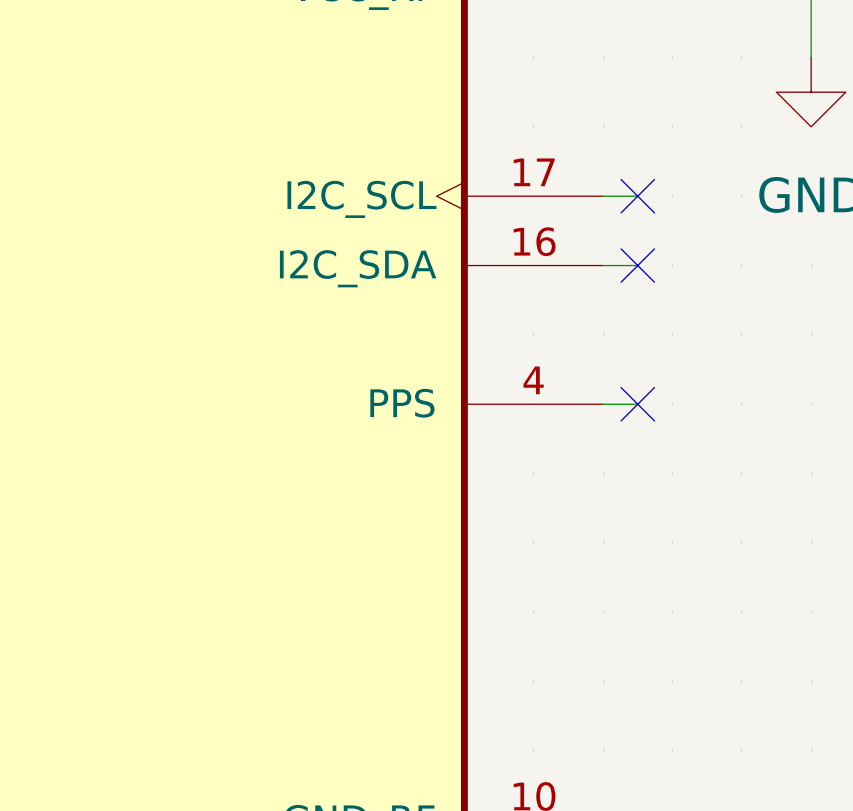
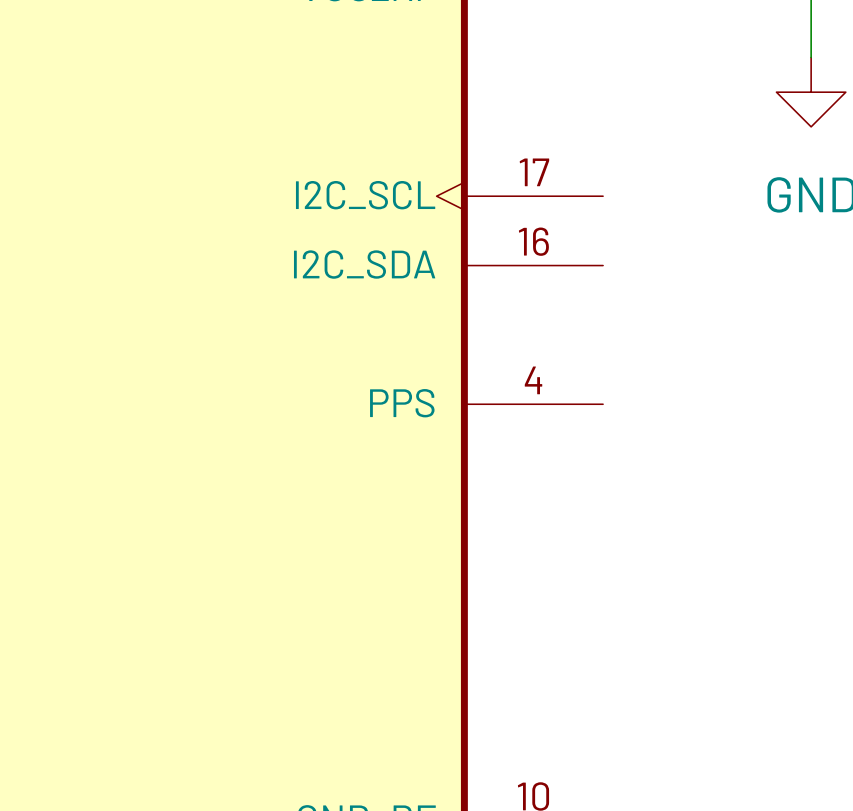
wire: (603, 196) (637, 196) -> none
no-connect mark: (637, 196) -> none
wire: (603, 265) (637, 265) -> none
no-connect mark: (637, 265) -> none
wire: (603, 404) (637, 404) -> none
no-connect mark: (637, 404) -> none

